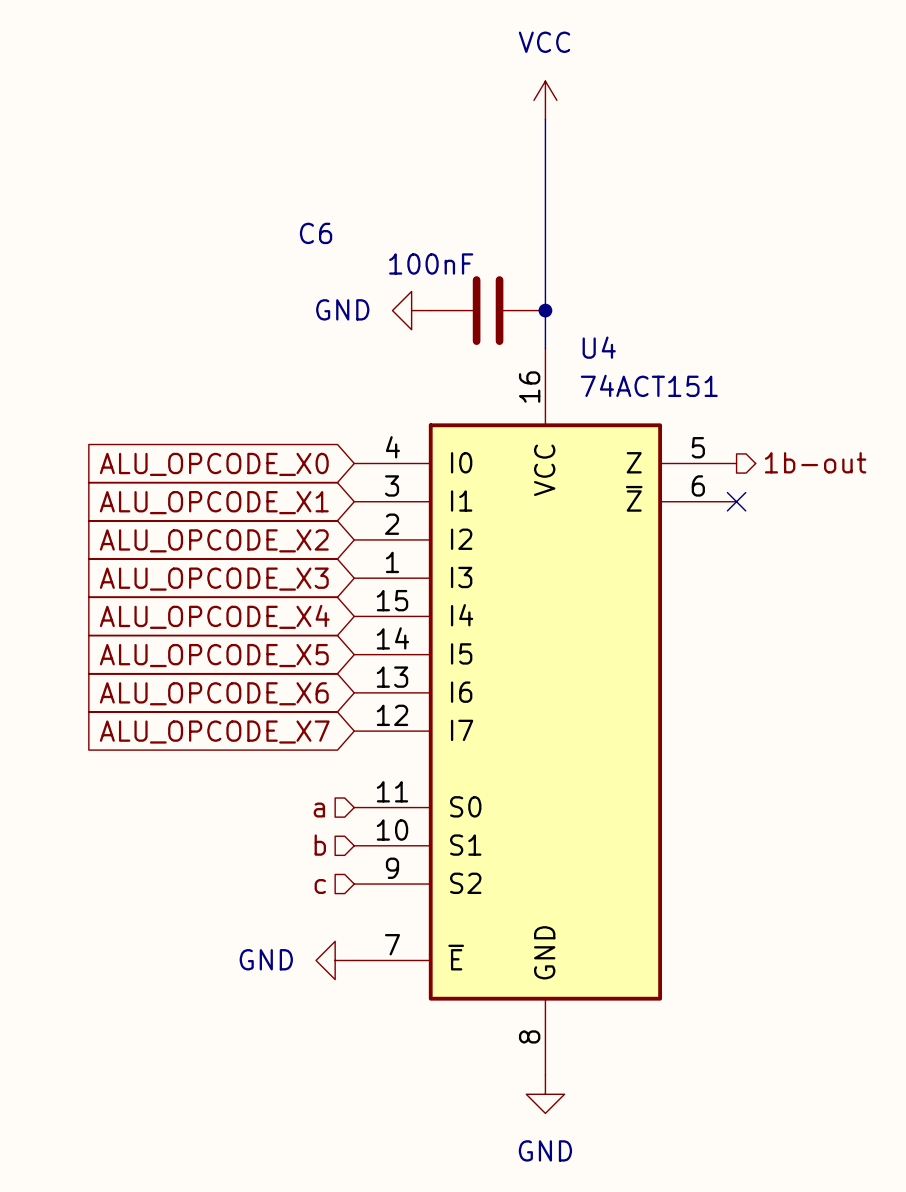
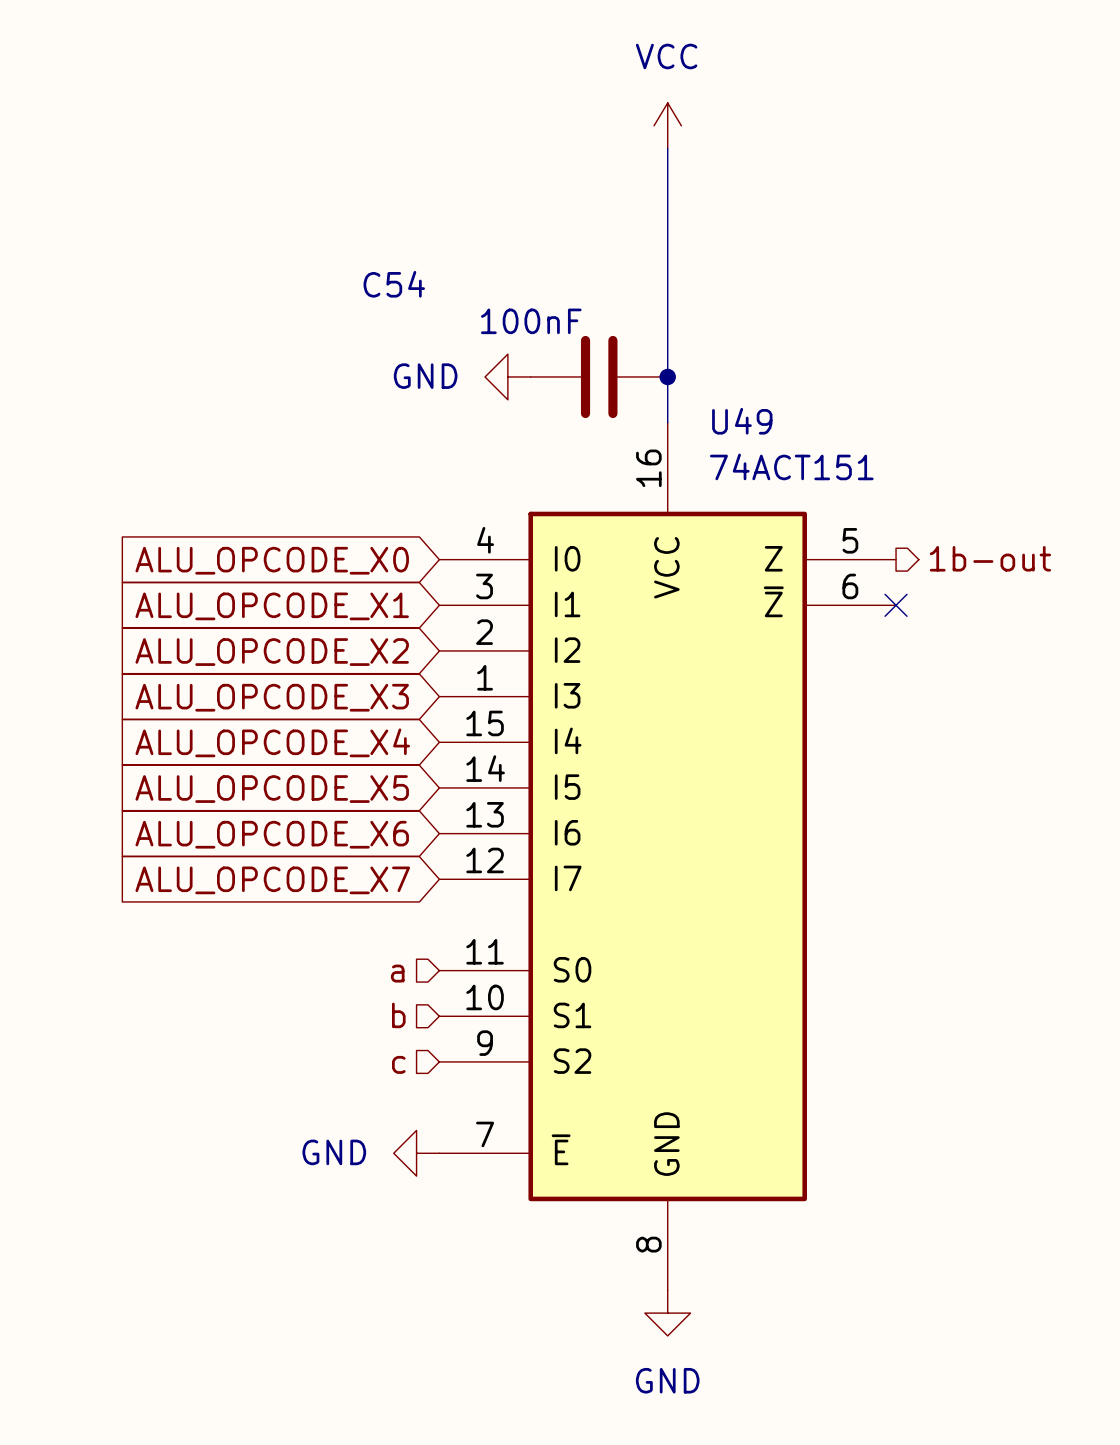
C6 name: C6 (316, 233) -> C54 (394, 284)
U4 name: U4 (599, 347) -> U49 (742, 421)

